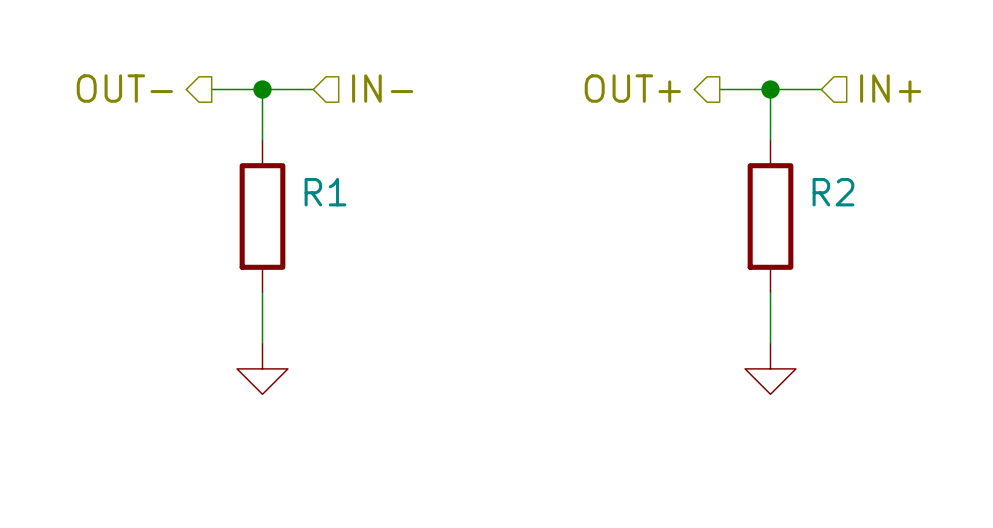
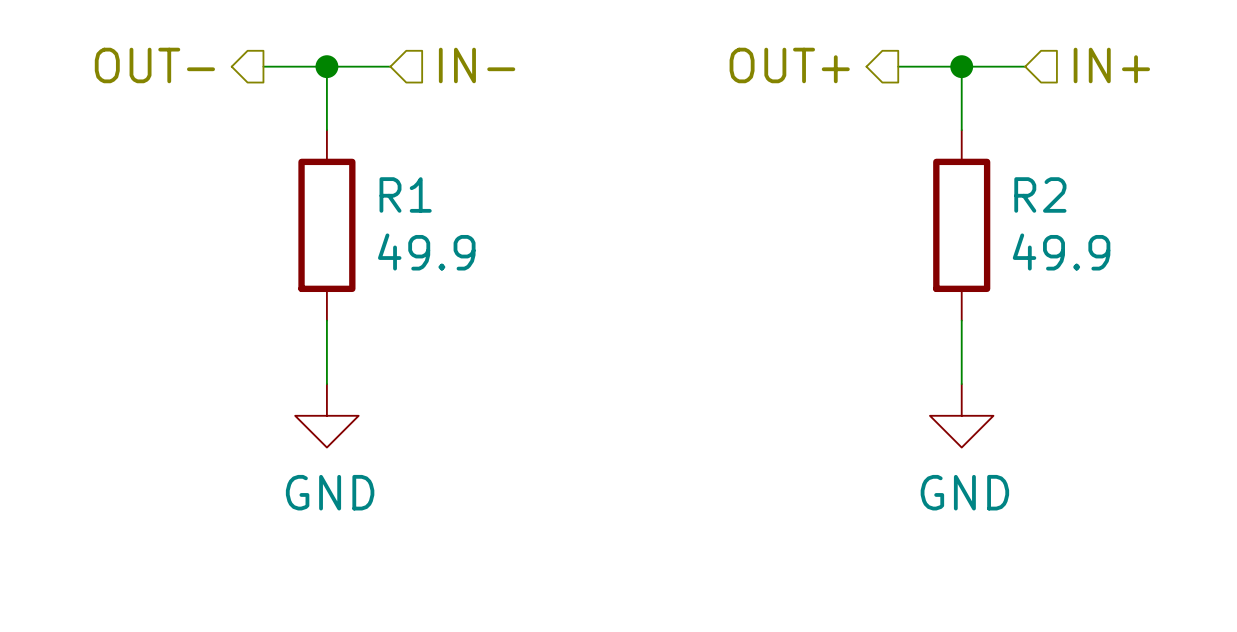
R1 value: none -> 49.9 (426, 251)
R2 value: none -> 49.9 (1061, 251)
power symbol text: none -> GND (330, 492)
power symbol text: none -> GND (964, 492)

